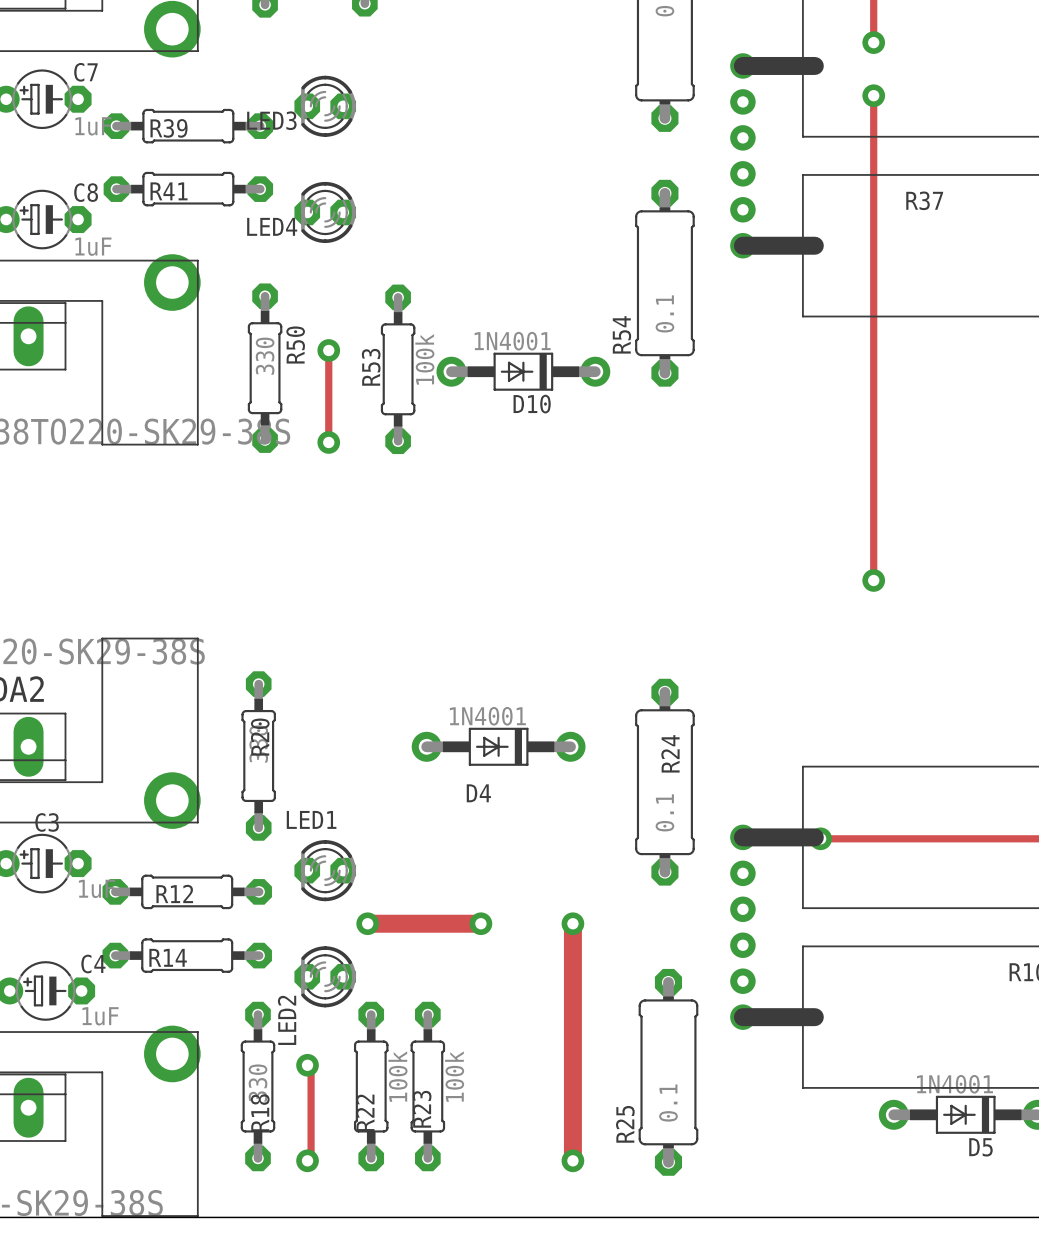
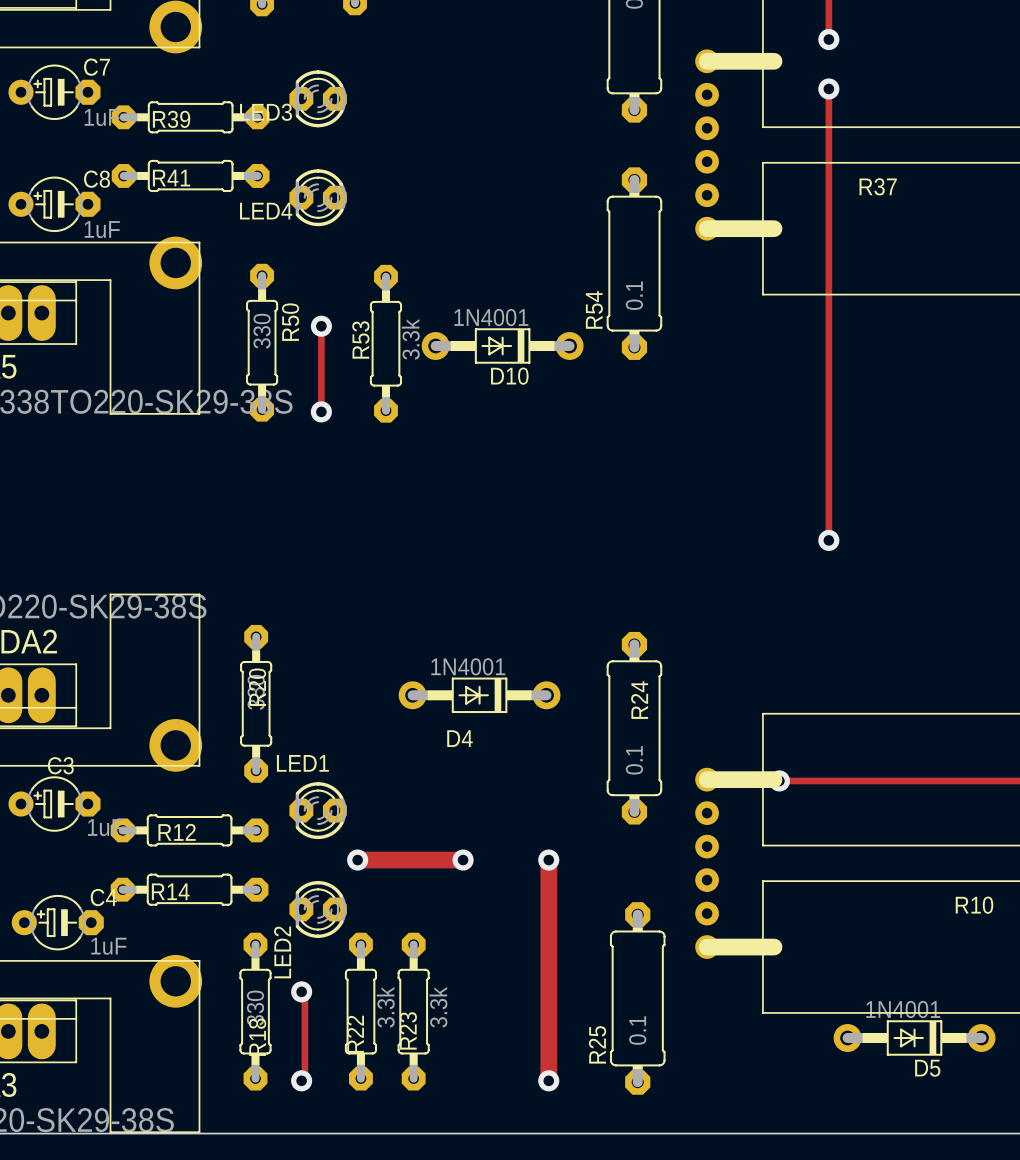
R53 value: 100k (424, 359) -> 3.3k (410, 339)
R22 value: 100k (397, 1076) -> 3.3k (385, 1007)
R23 value: 100k (454, 1076) -> 3.3k (438, 1007)

